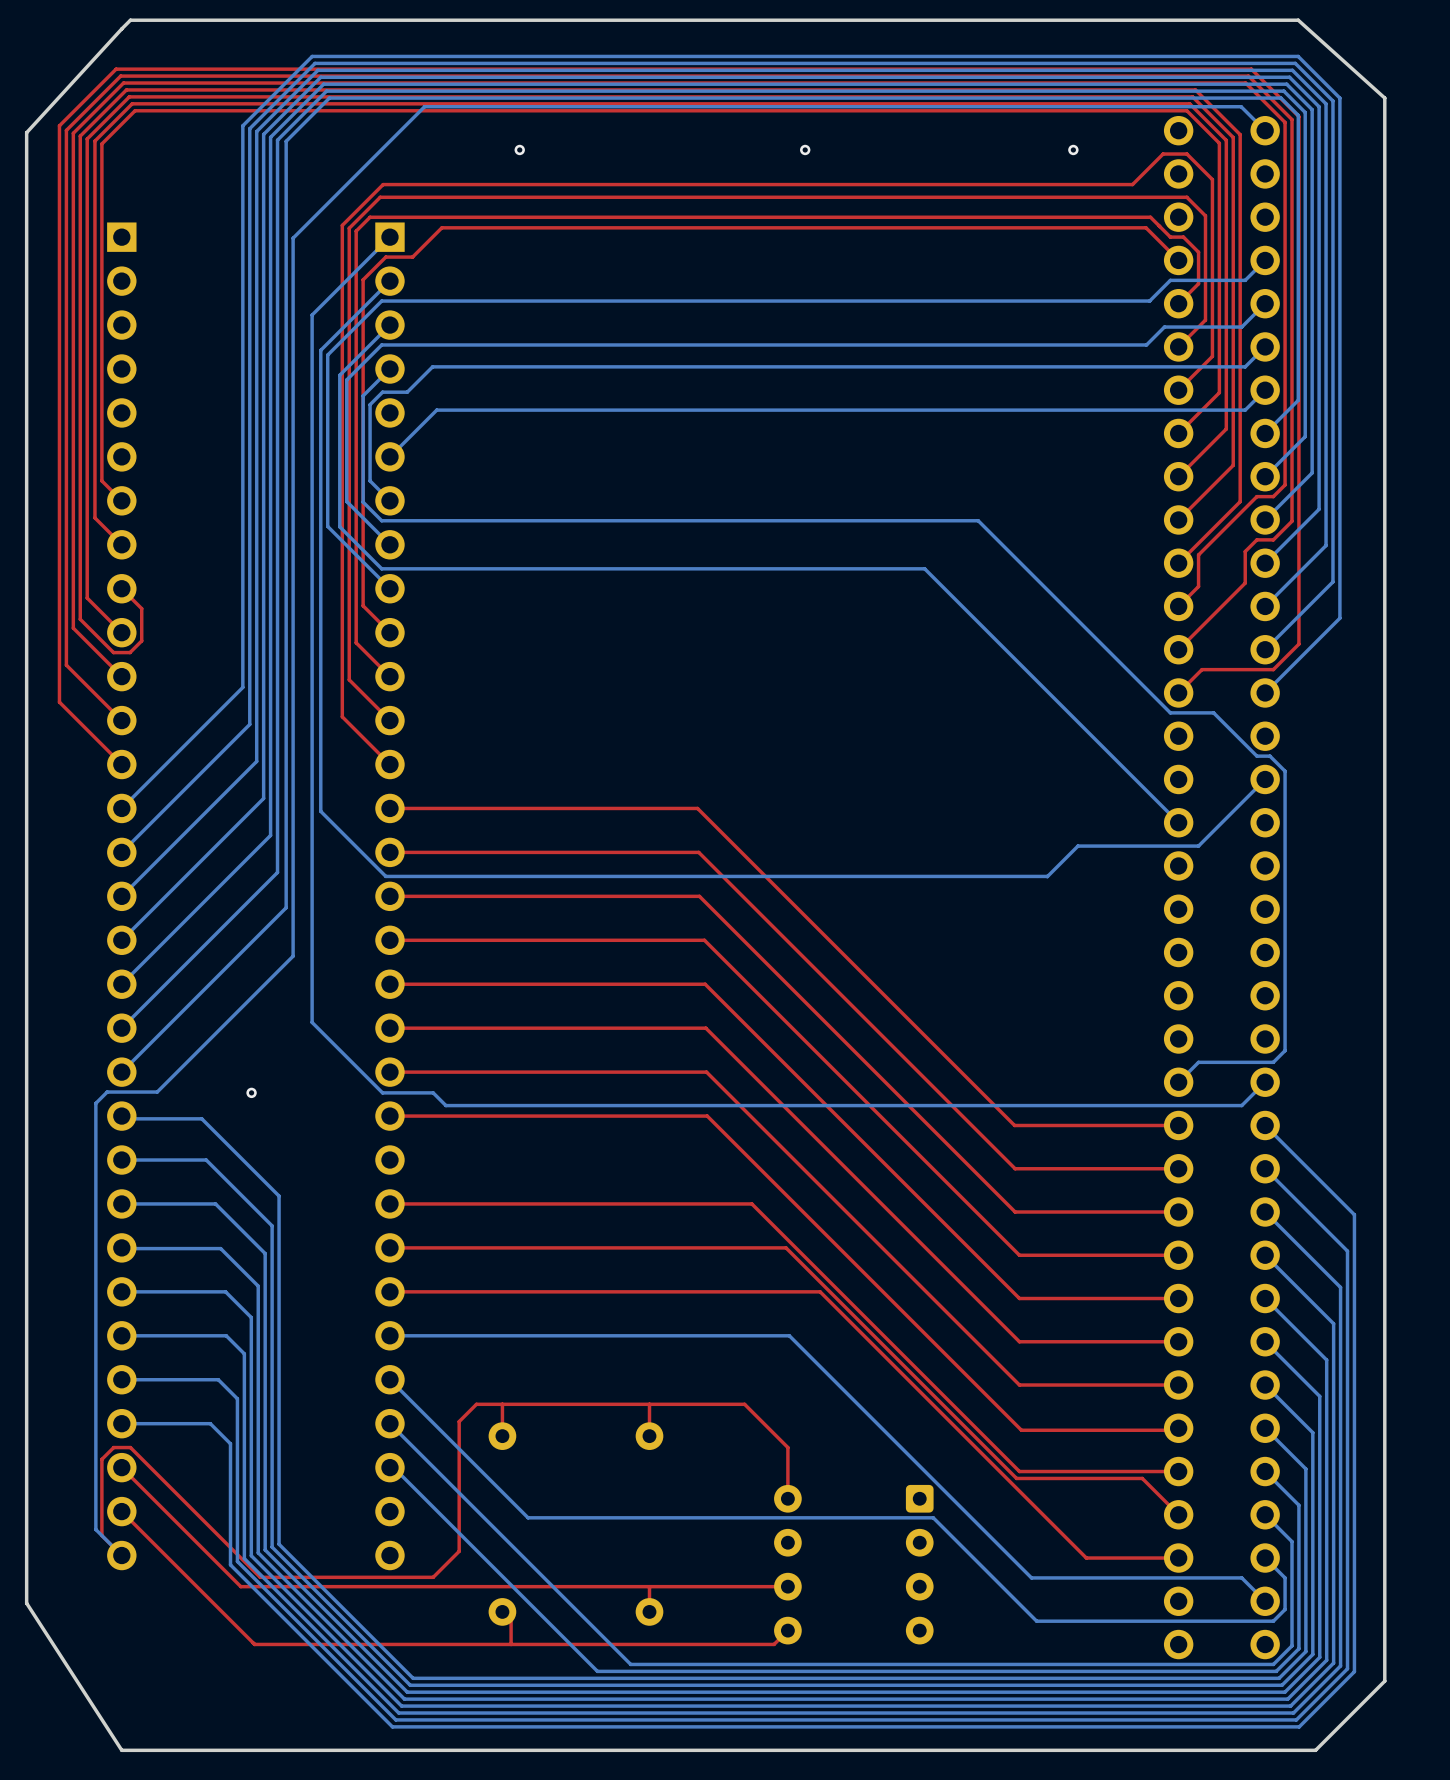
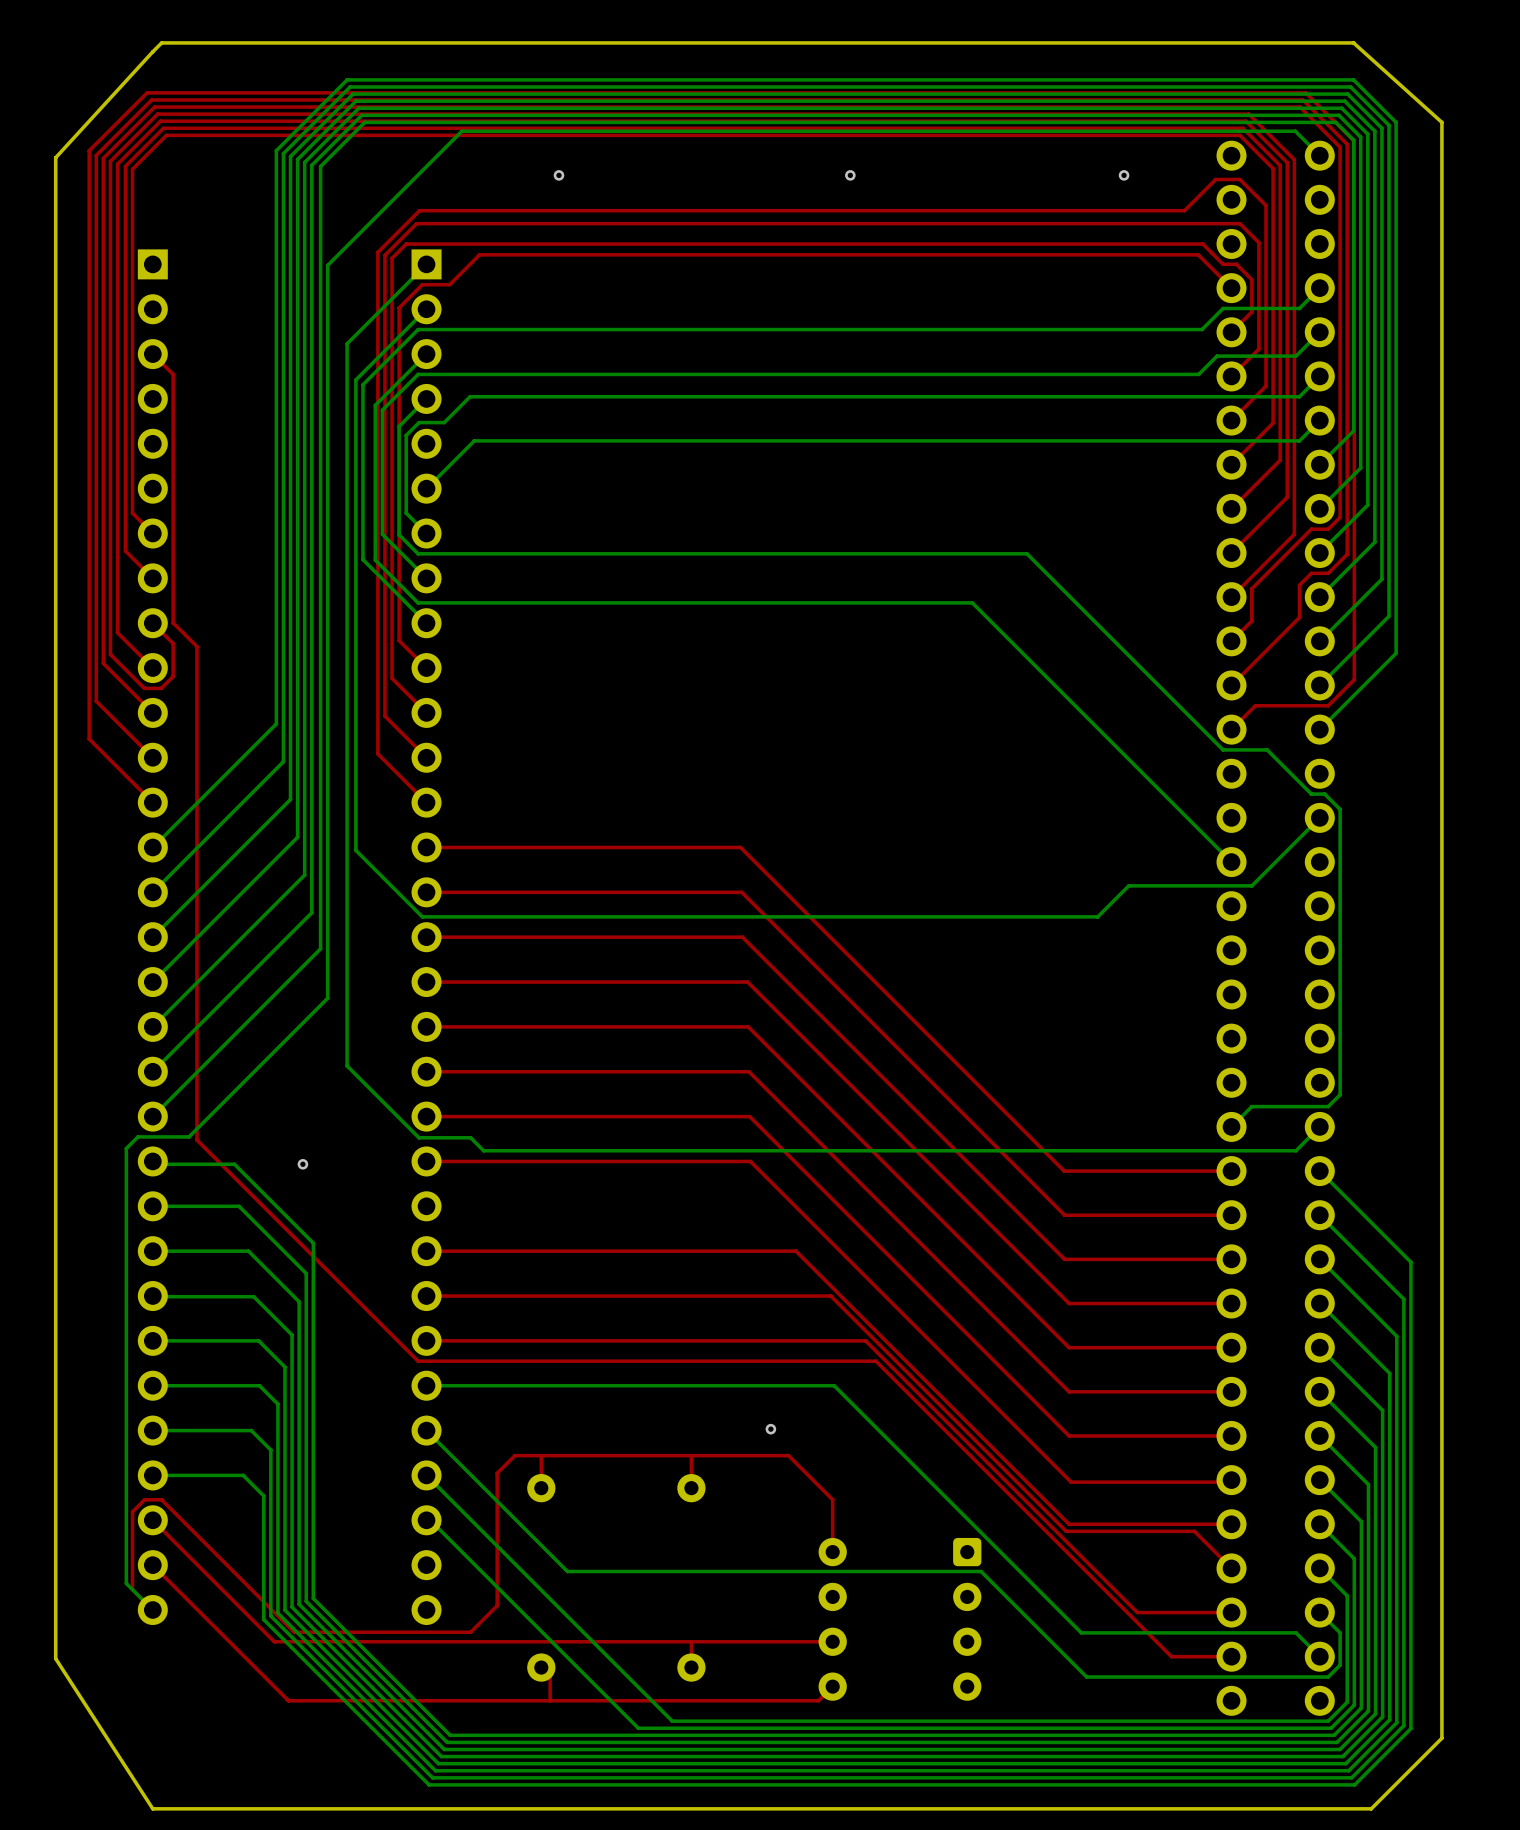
top track: none -> (152, 354) (173, 374) (173, 622) (196, 646) (196, 1140) (418, 1361) (875, 1361) (1171, 1656) (1231, 1656)
via position: (251, 1092) -> (302, 1164)
via: none -> (770, 1429)

